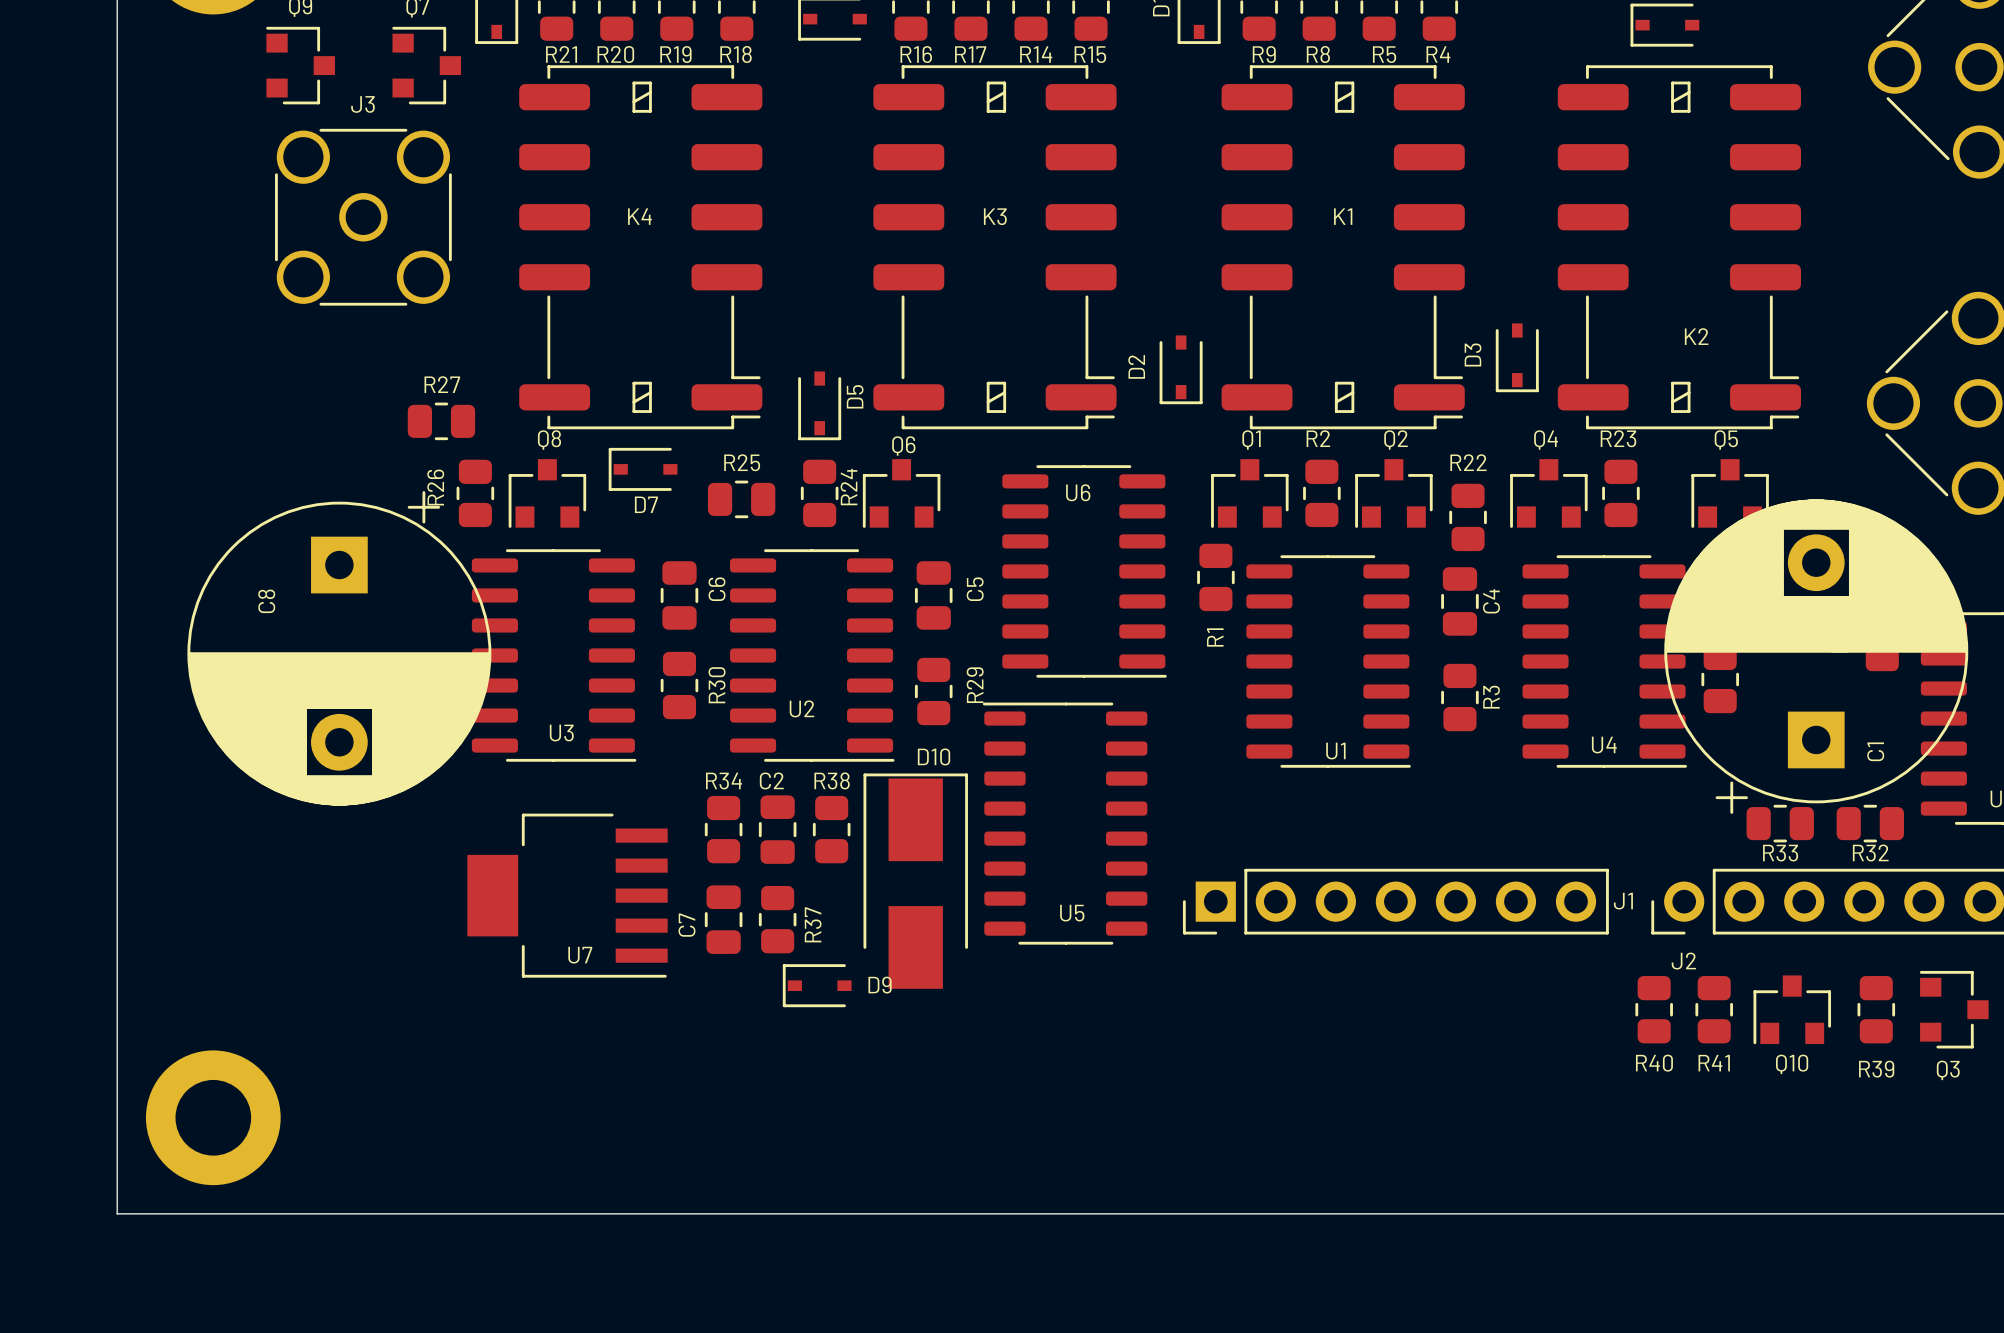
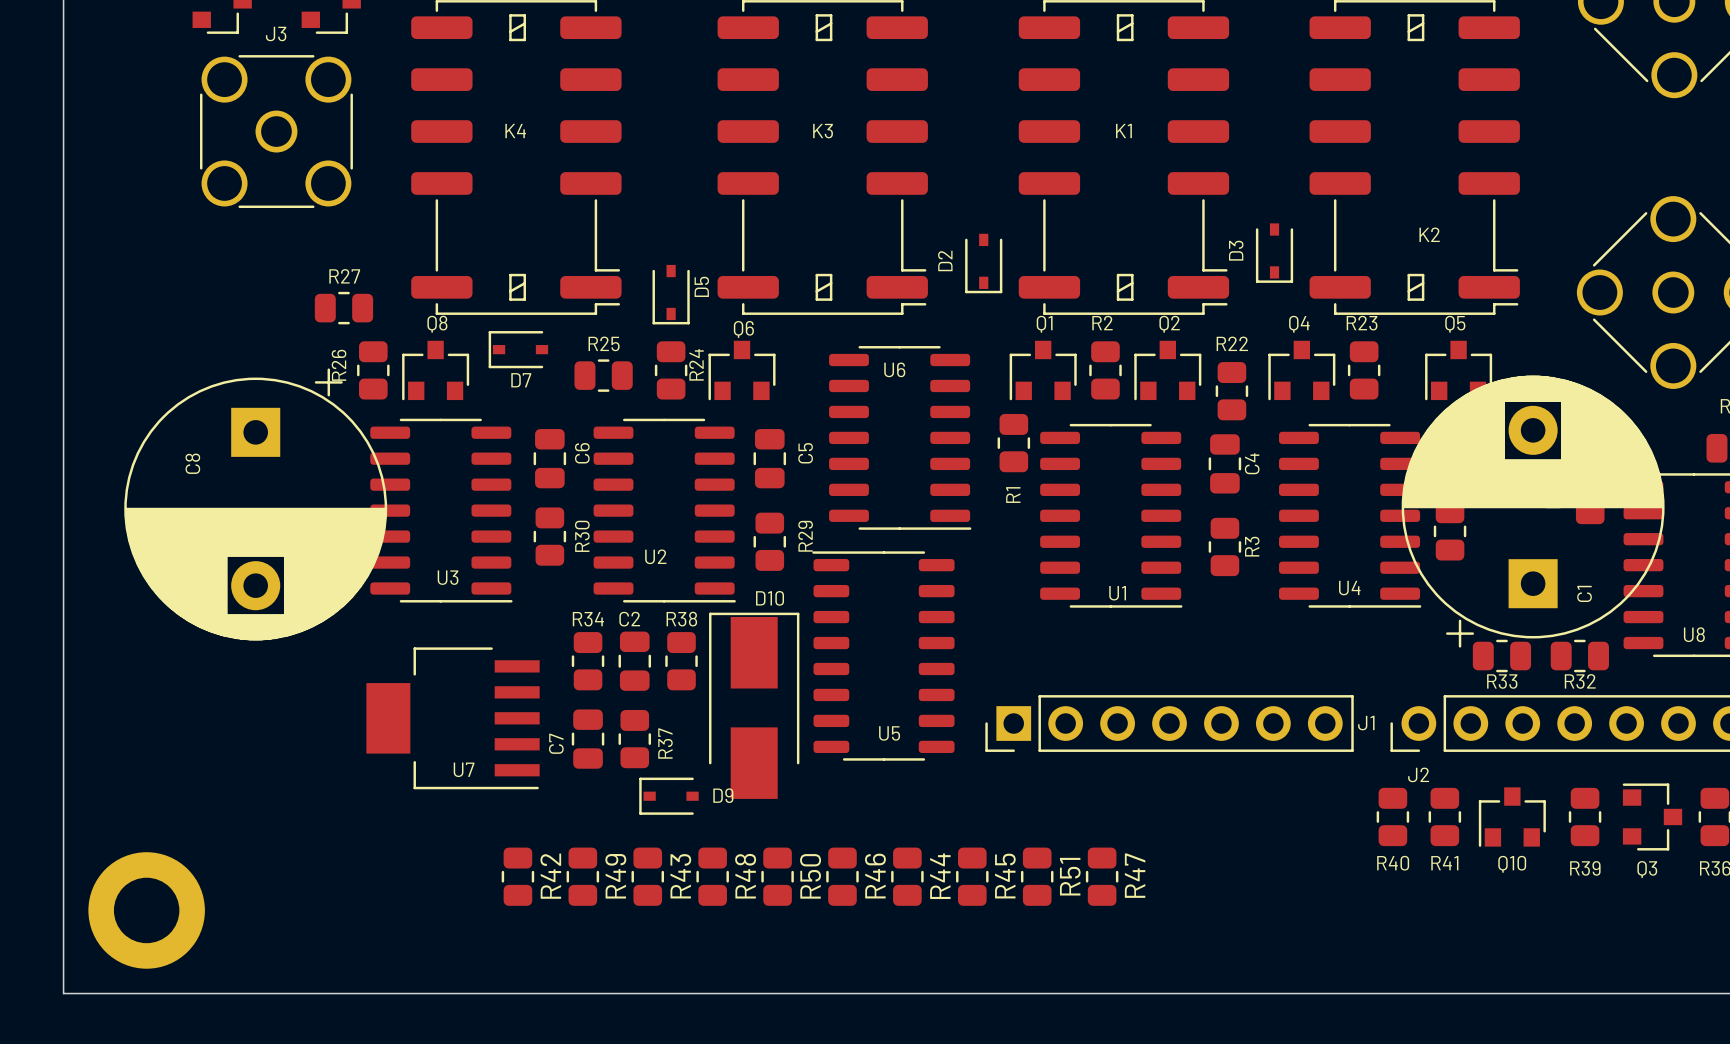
R42: none -> (517, 876)
R49: none -> (582, 876)
R43: none -> (647, 876)
R48: none -> (712, 876)
R50: none -> (777, 876)
R46: none -> (842, 876)
R44: none -> (907, 876)
R45: none -> (972, 876)
R51: none -> (1037, 876)
R47: none -> (1102, 876)

